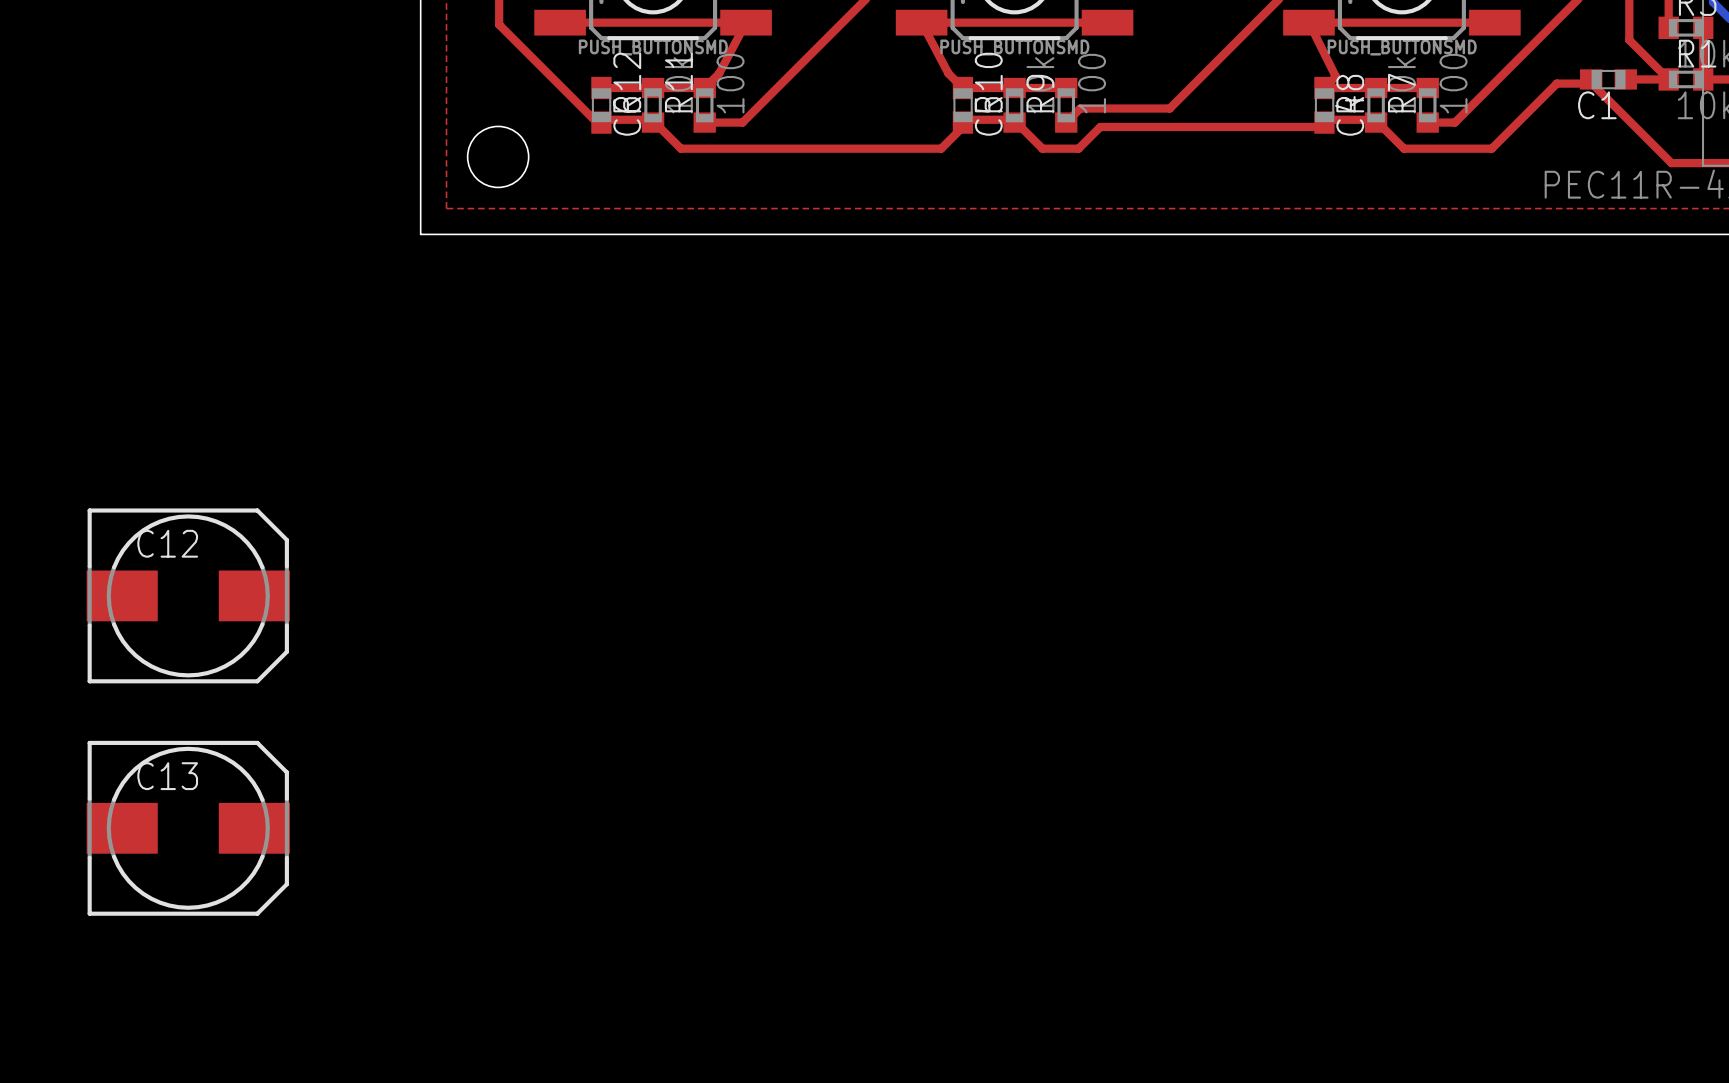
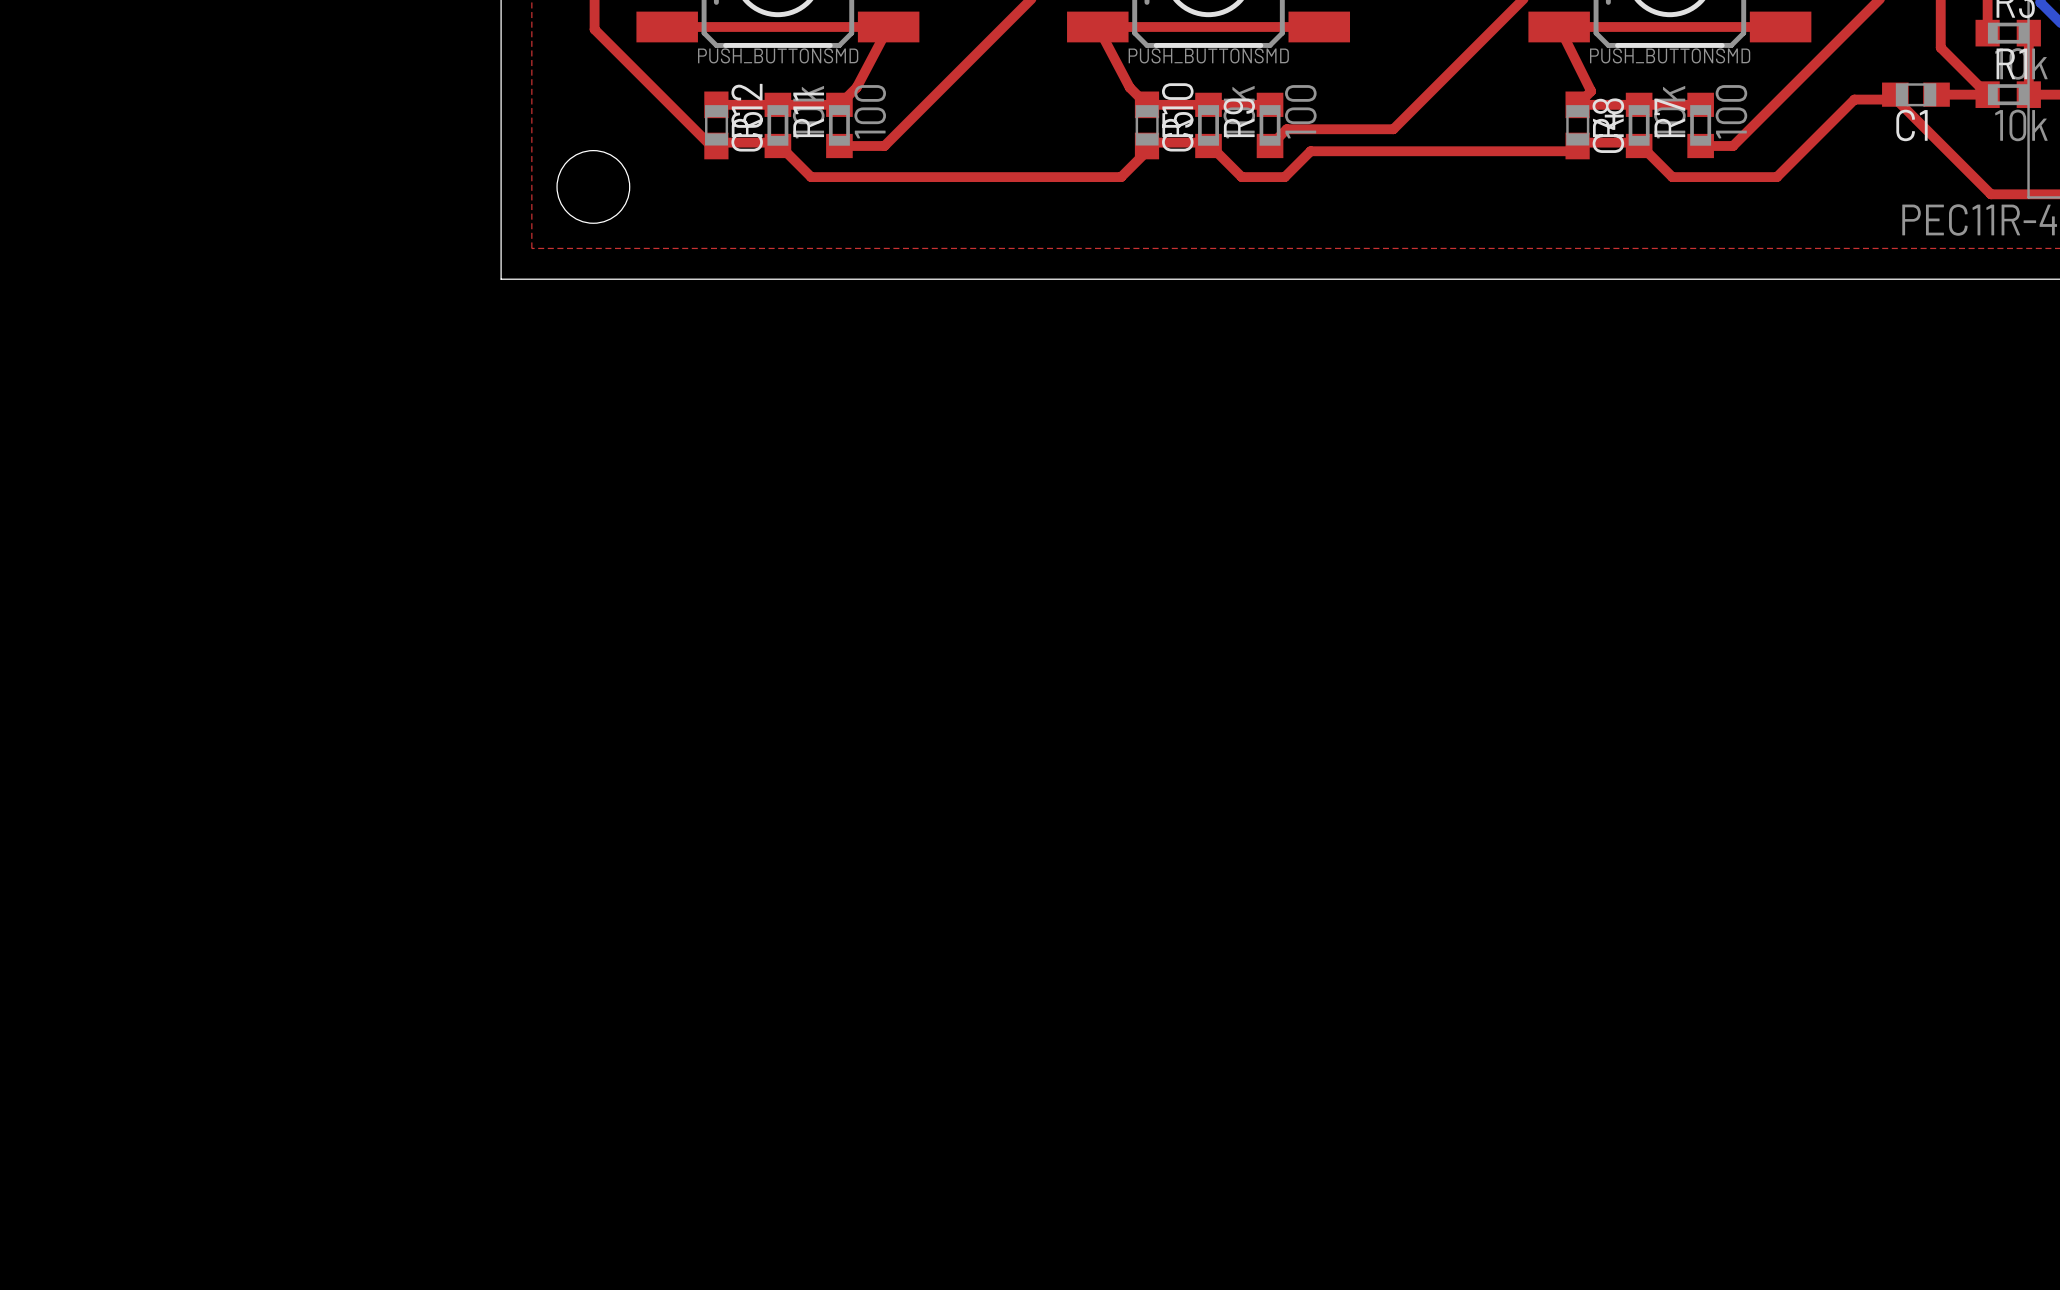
C12: (188, 595) -> none
C13: (188, 828) -> none

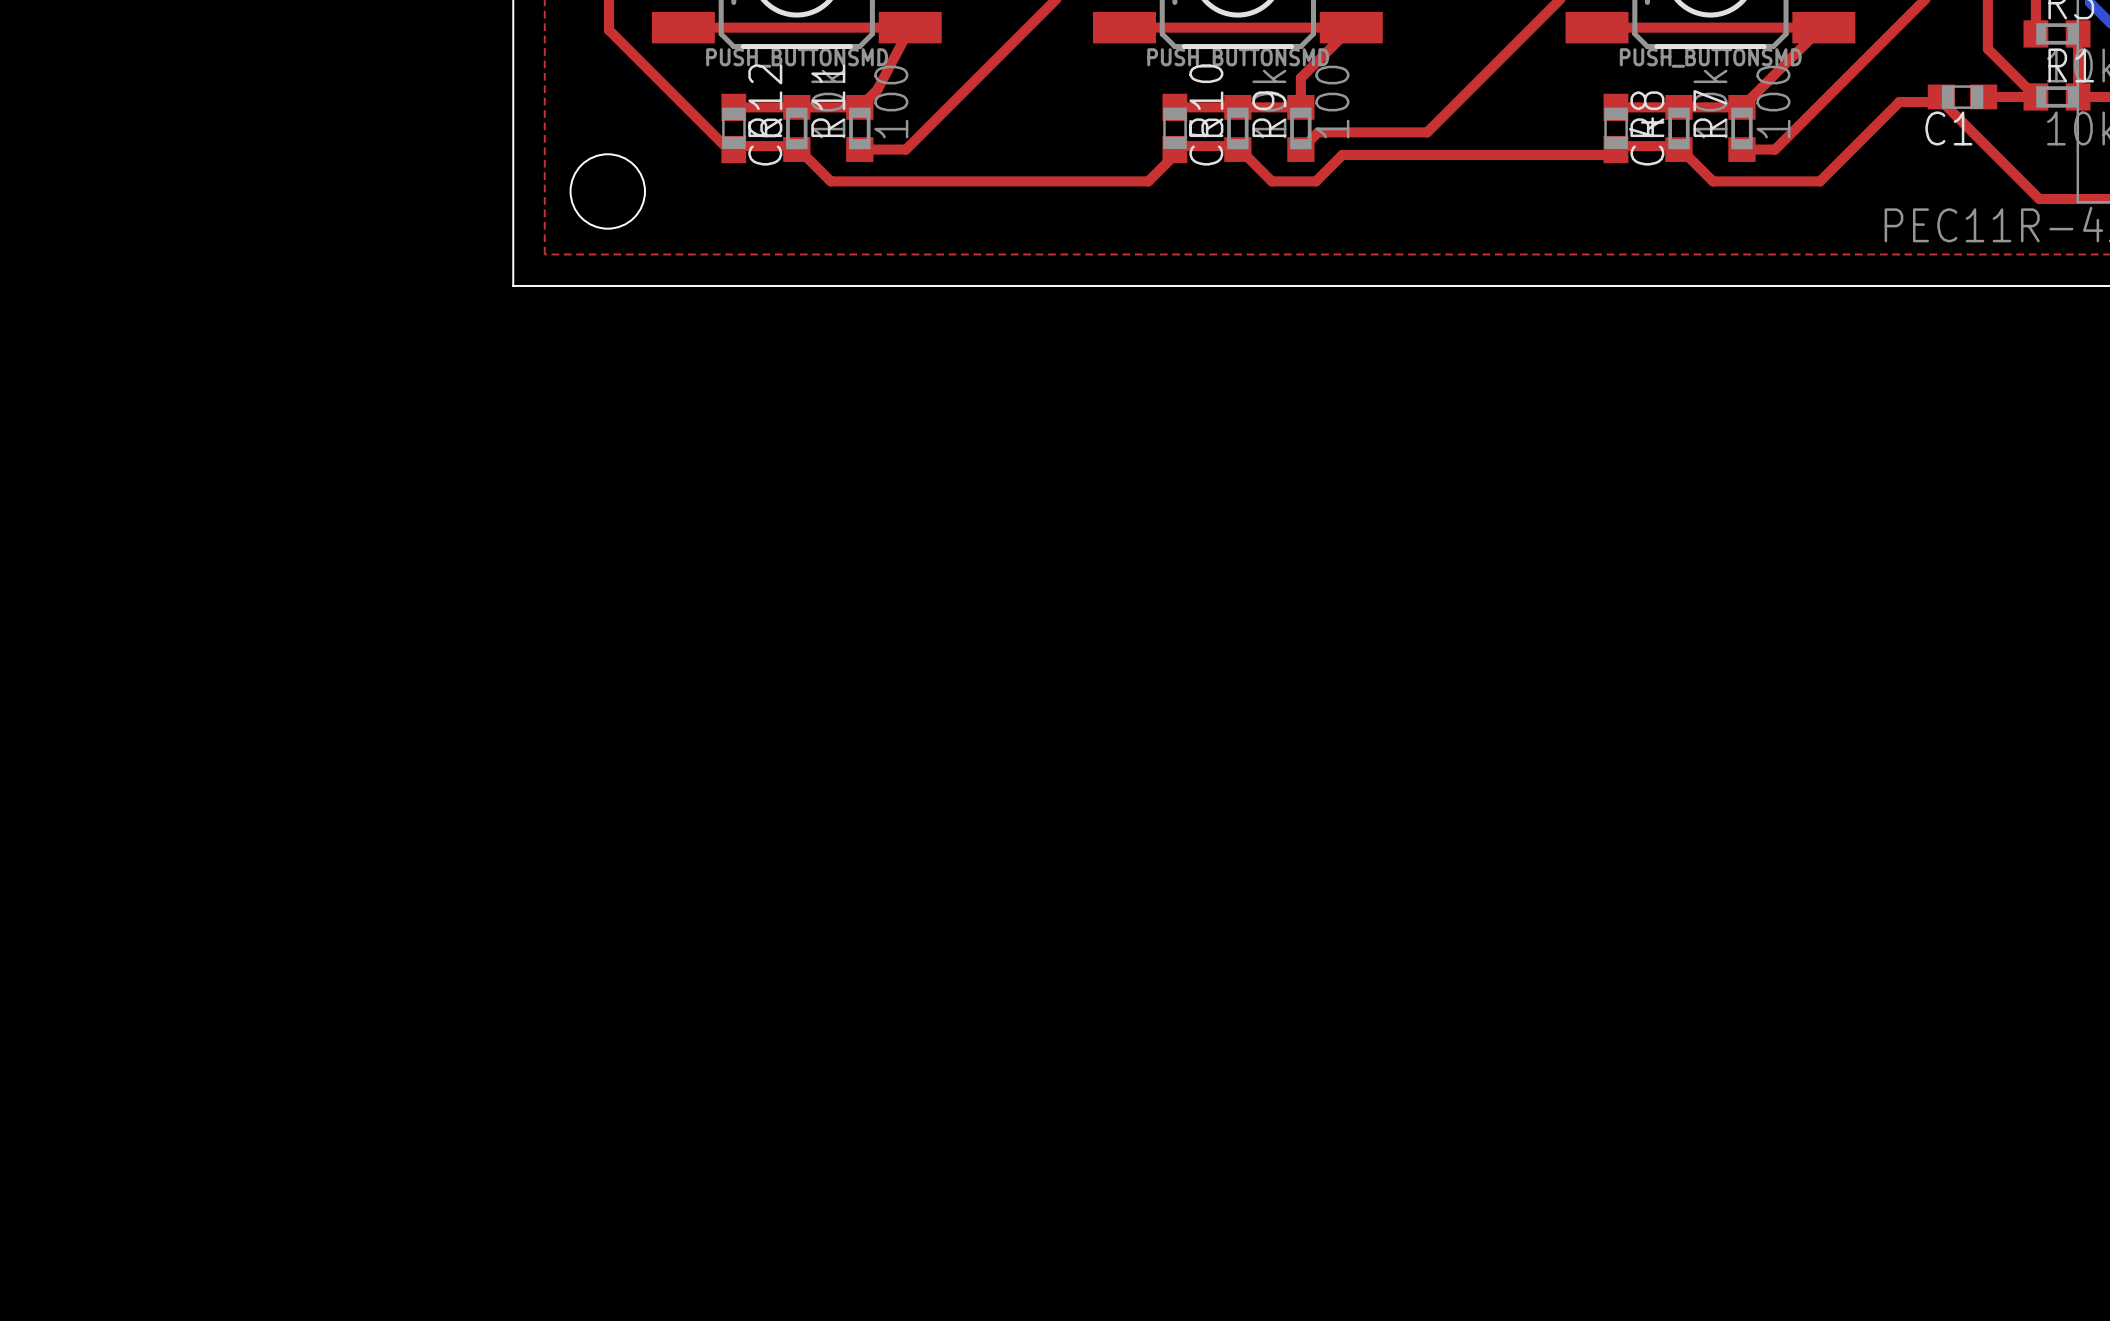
top track: (1097, 26) (1129, 87) (1147, 104) -> none
top track: none -> (1351, 27) (1300, 78) (1300, 107)
top track: (1559, 26) (1591, 91) (1577, 104) -> none
top track: none -> (1821, 27) (1741, 107)

